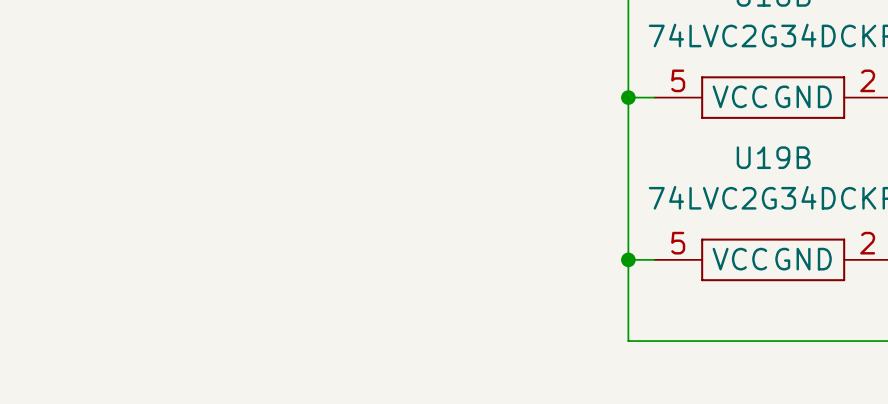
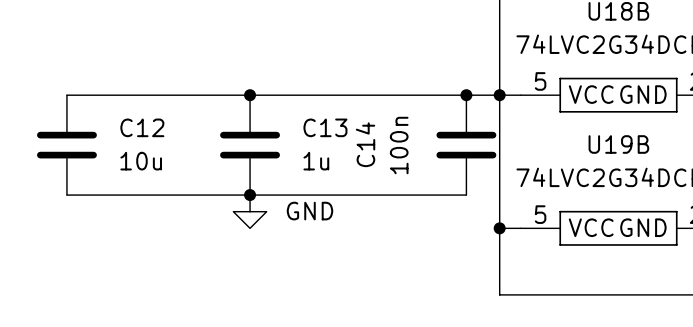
wire: none -> (66, 95) (499, 95)
junction: none -> (250, 95)
junction: none -> (466, 95)
C12: none -> 10u (66, 145)
C13: none -> 1u (250, 145)
C14: none -> 100n (466, 145)
wire: none -> (66, 195) (466, 195)
junction: none -> (250, 195)
power symbol: none -> GND (250, 211)

